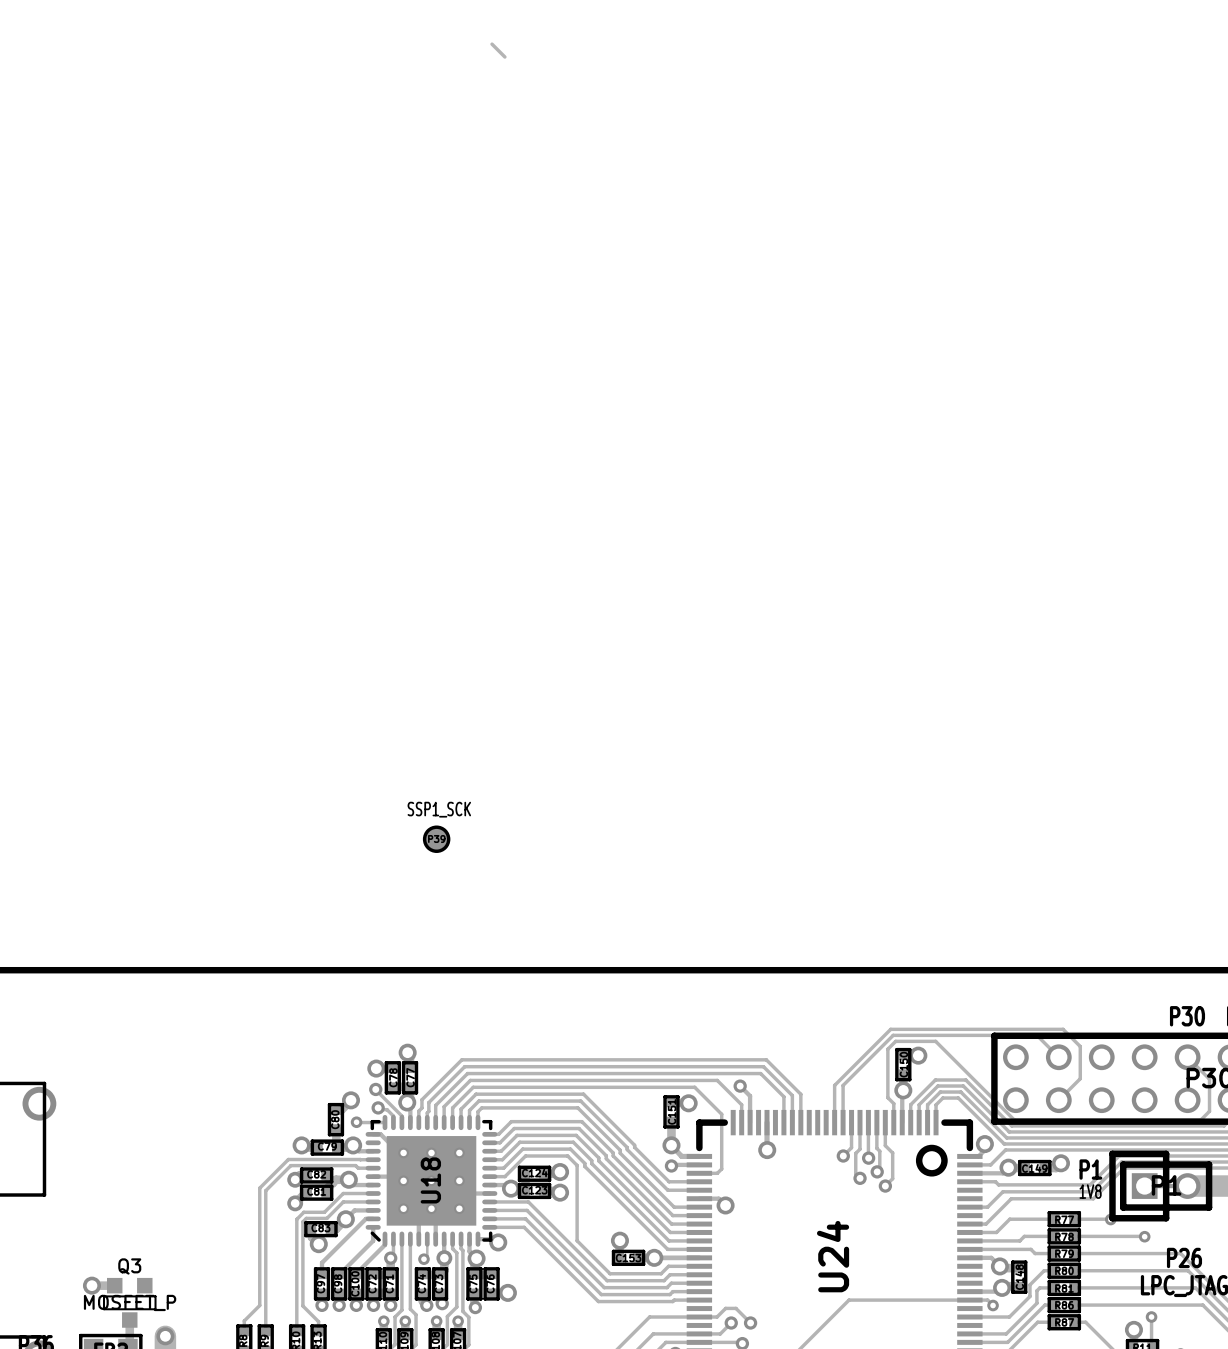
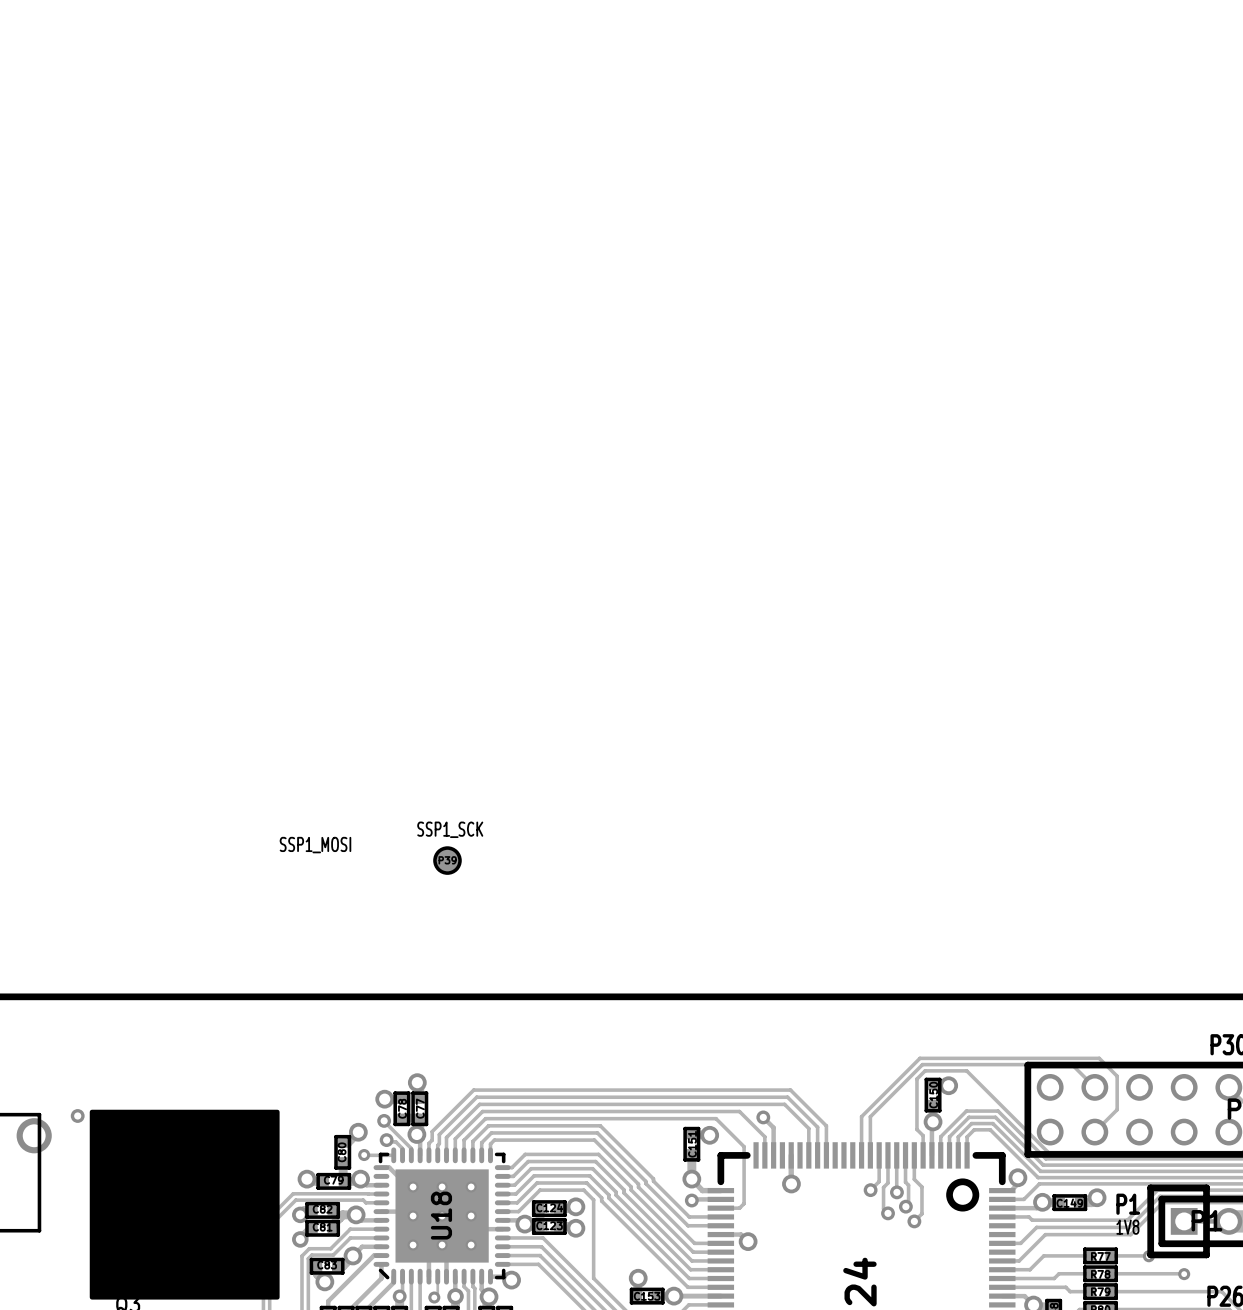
track: (492, 44) (504, 57) -> none
text: none -> SSP1_MOSI (315, 845)
drawing: none -> [89, 1109, 280, 1300]
via: none -> (77, 1115)

